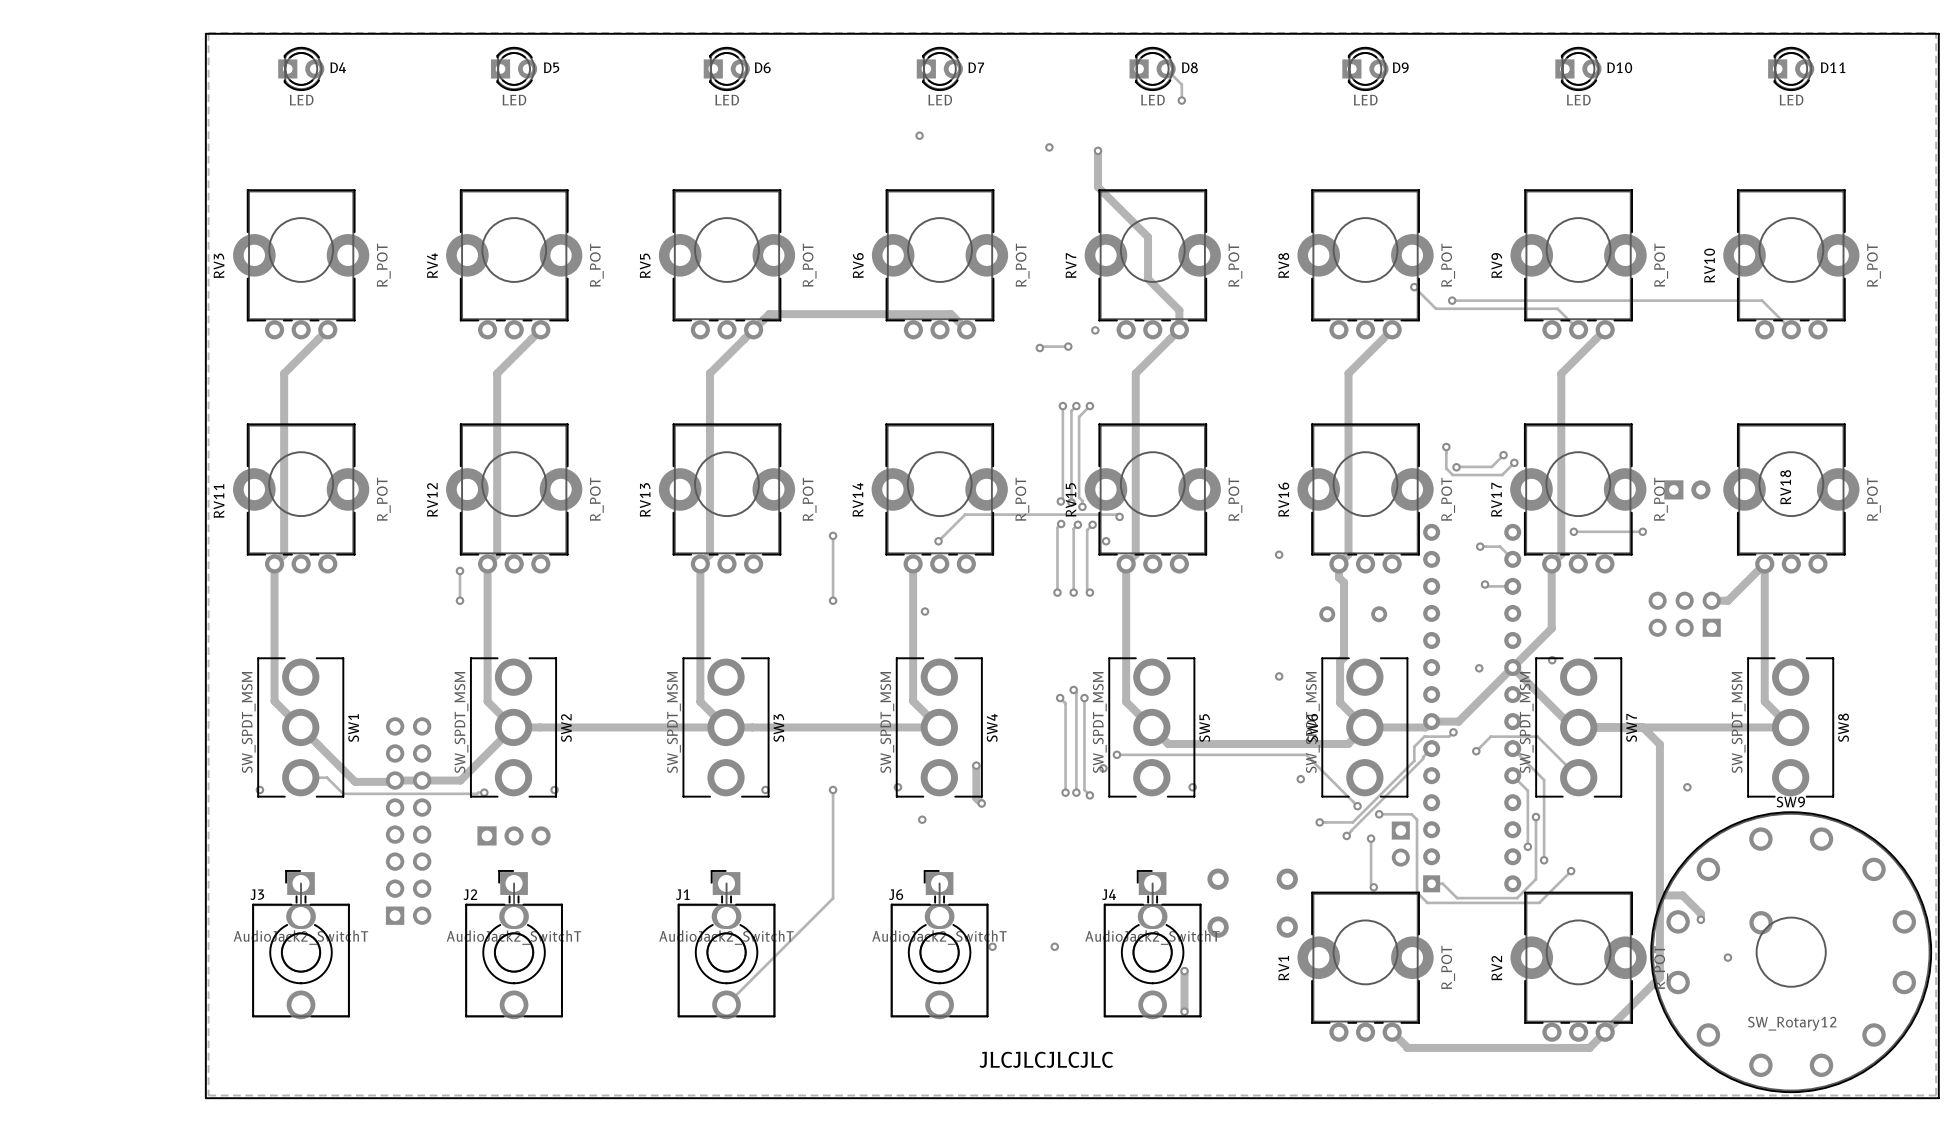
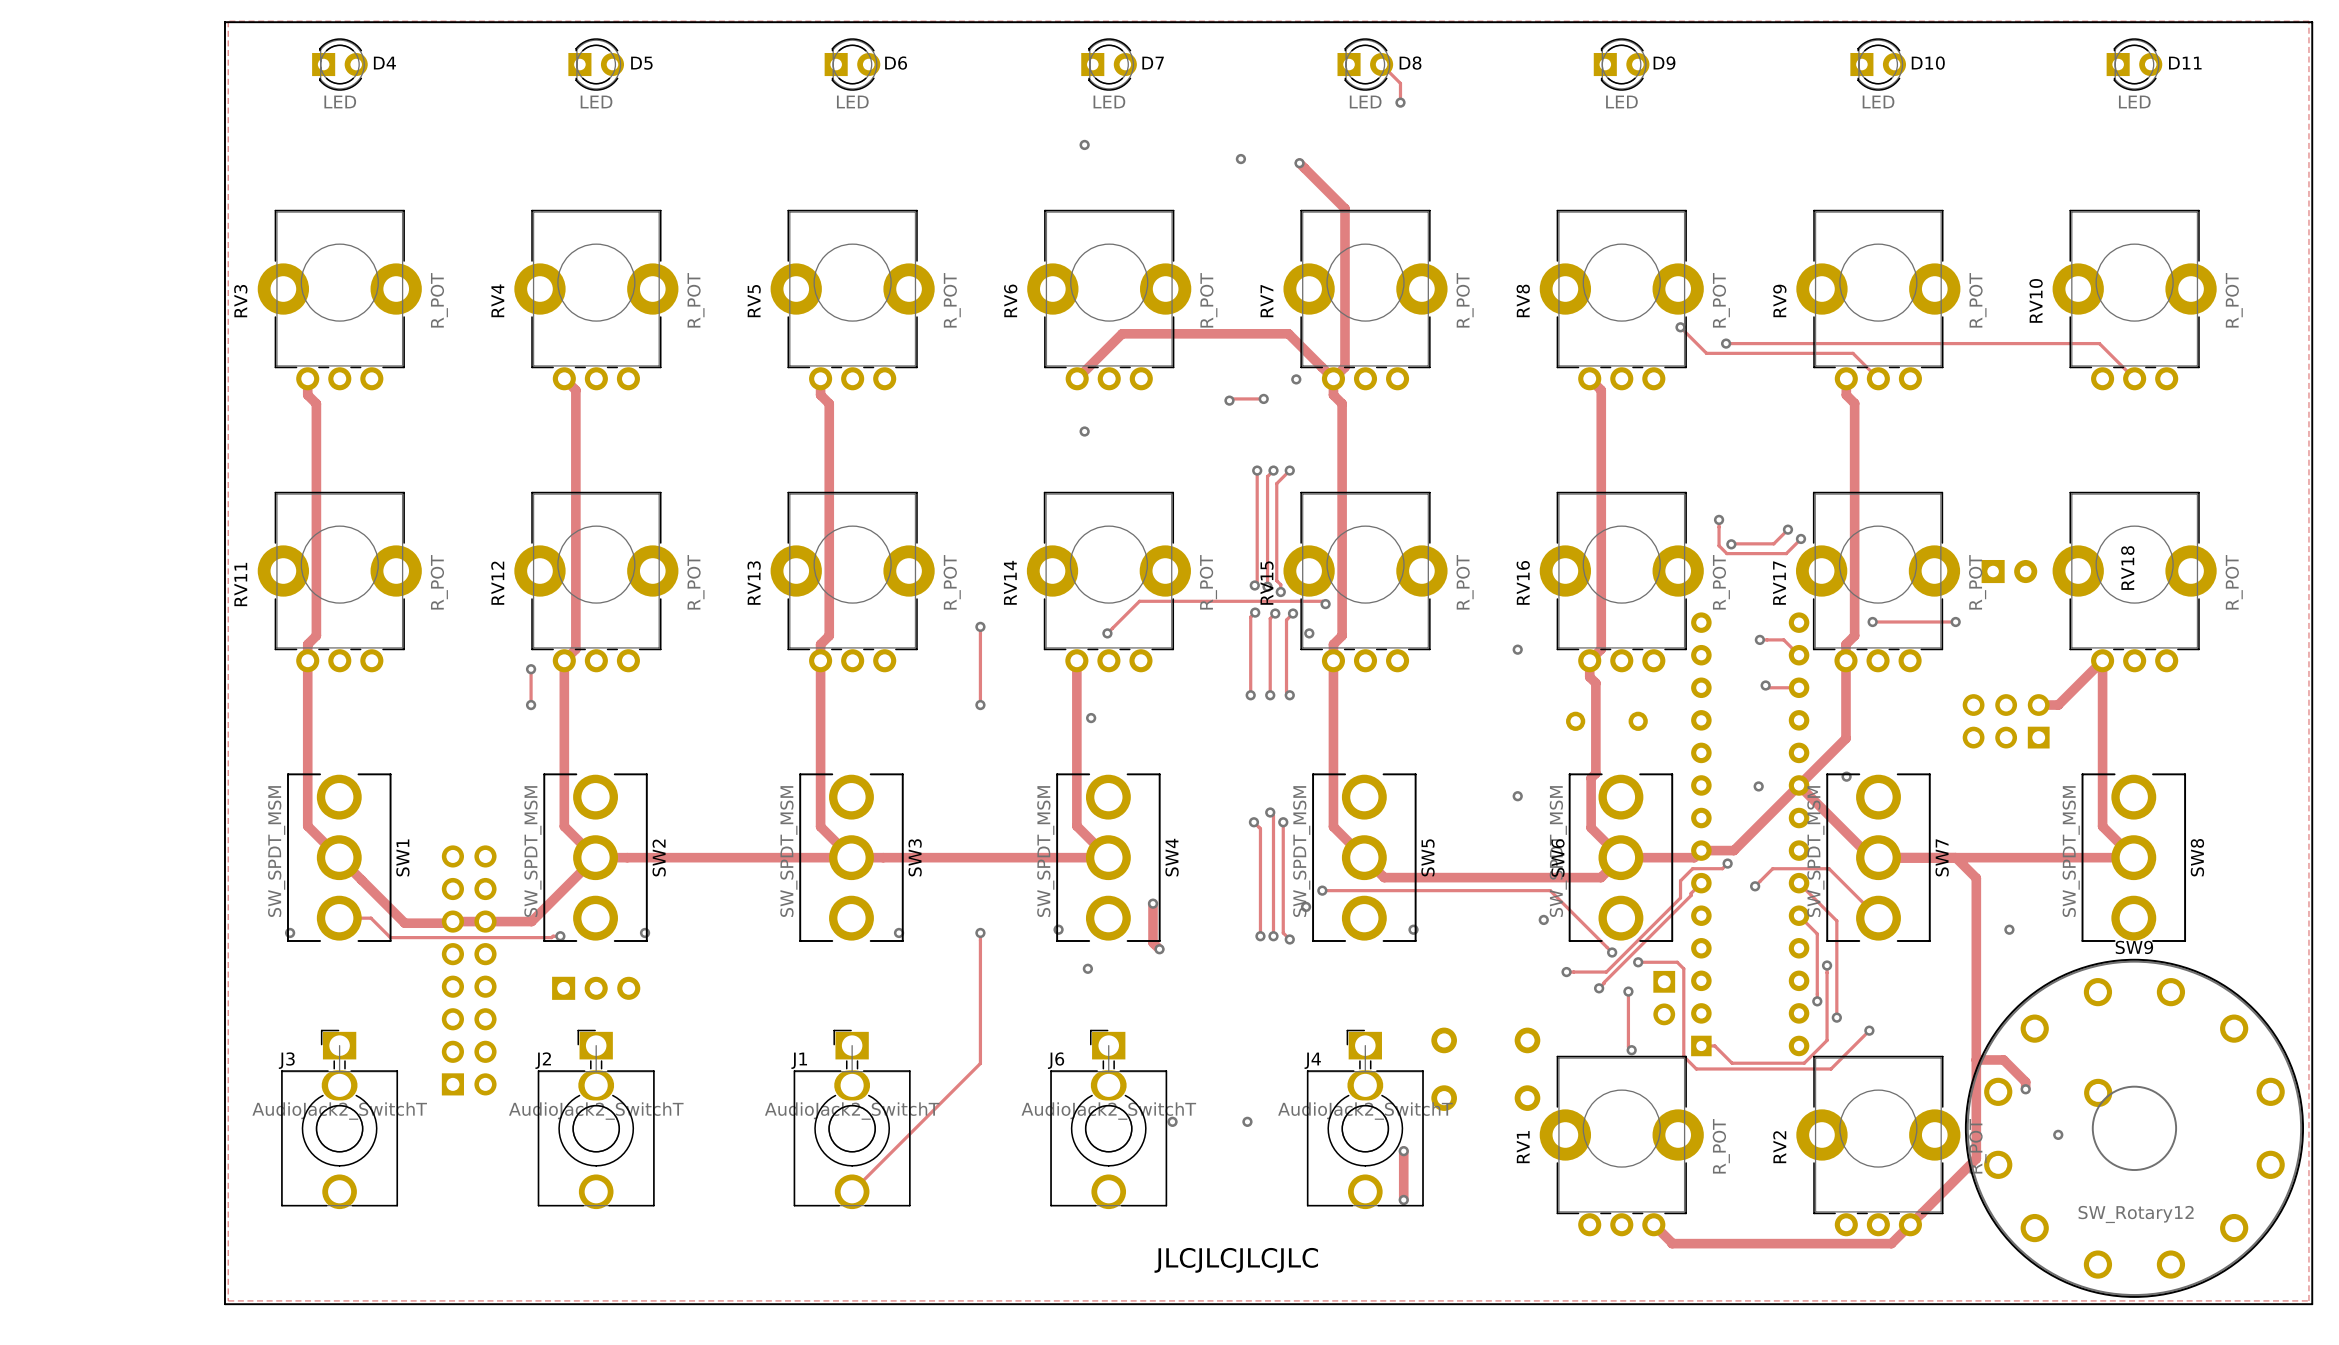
track: (1098, 150) (1098, 187) (1148, 237) (1148, 279) (1179, 310) (1179, 329) (1135, 373) (1135, 554) (1126, 563) -> (1333, 378) (1333, 395) (1342, 403) (1342, 635) (1333, 644) (1333, 660)
track: none -> (1299, 163) (1344, 208) (1344, 367) (1333, 378)
track: (327, 329) (284, 373) (284, 554) (274, 563) -> (307, 378) (307, 395) (316, 403) (316, 635) (307, 644) (307, 660)
track: (540, 329) (497, 373) -> (564, 378) (575, 390) (575, 431)
track: none -> (1077, 378) (1122, 333) (1288, 333) (1333, 378)
track: (966, 329) (950, 314) (769, 314) (709, 373) (709, 554) (700, 563) -> (820, 378) (820, 395) (829, 403) (829, 635) (820, 644) (820, 660)
track: (1392, 329) (1348, 373) -> (1589, 378) (1601, 390) (1601, 431)
track: (1605, 329) (1561, 373) (1561, 554) (1551, 563) -> (1846, 378) (1846, 395) (1854, 403) (1854, 635) (1845, 644) (1845, 660)
via: none -> (1084, 431)

